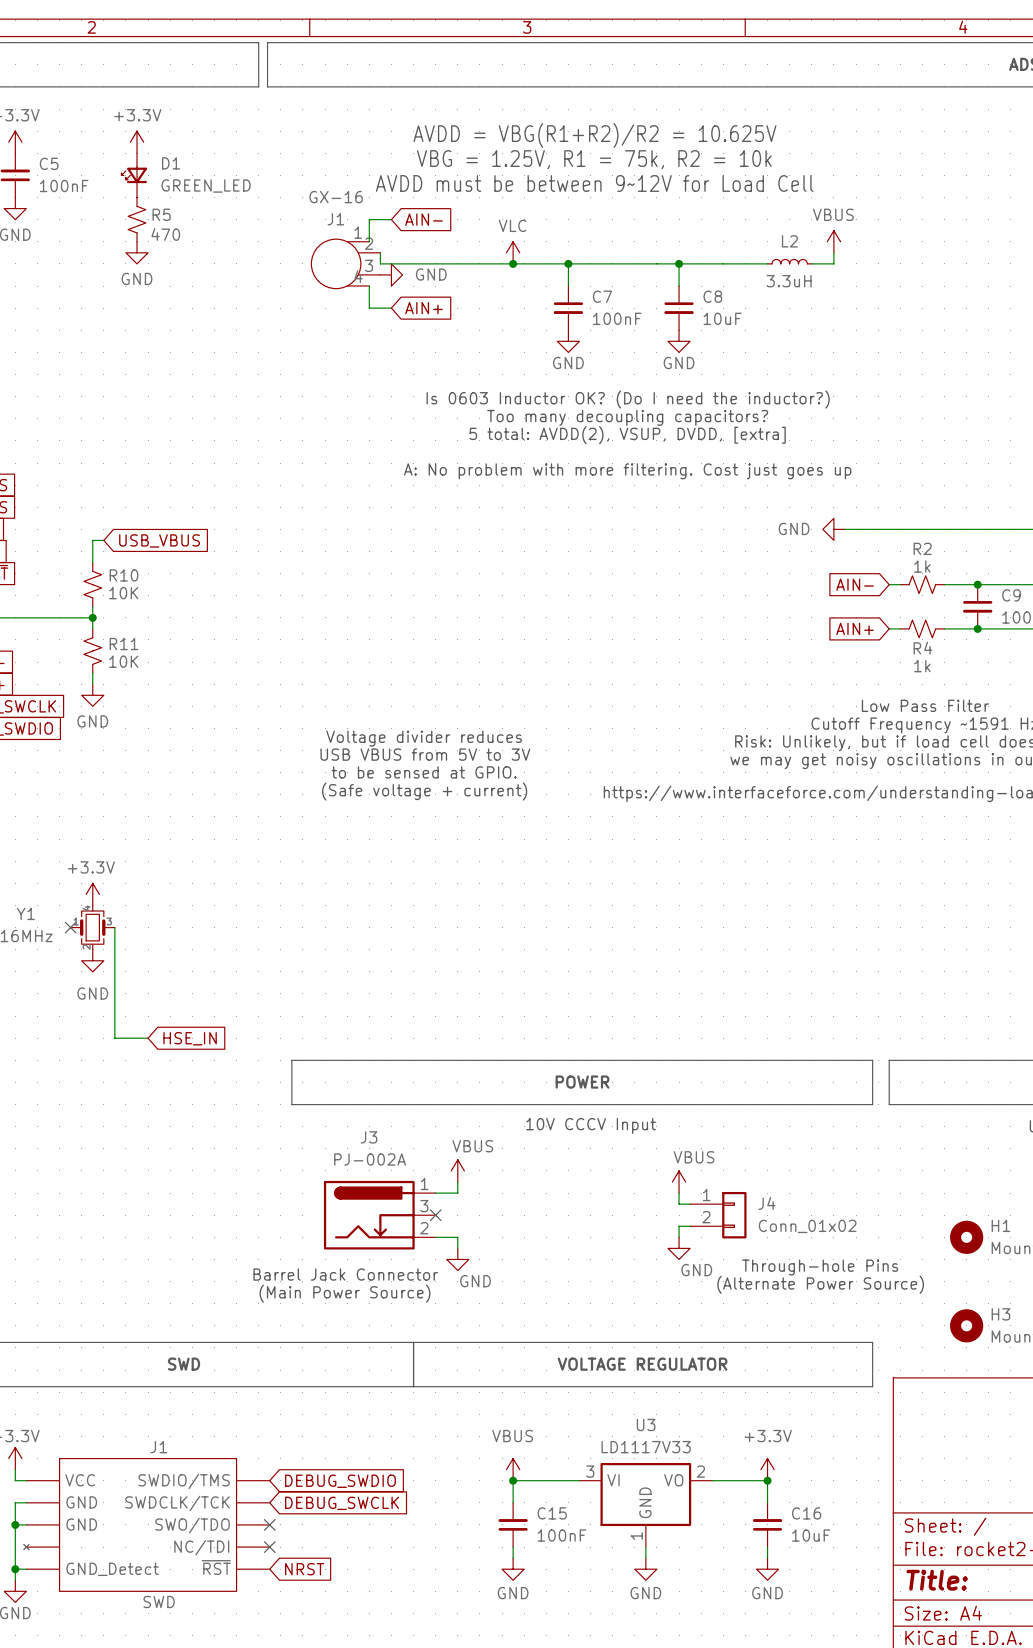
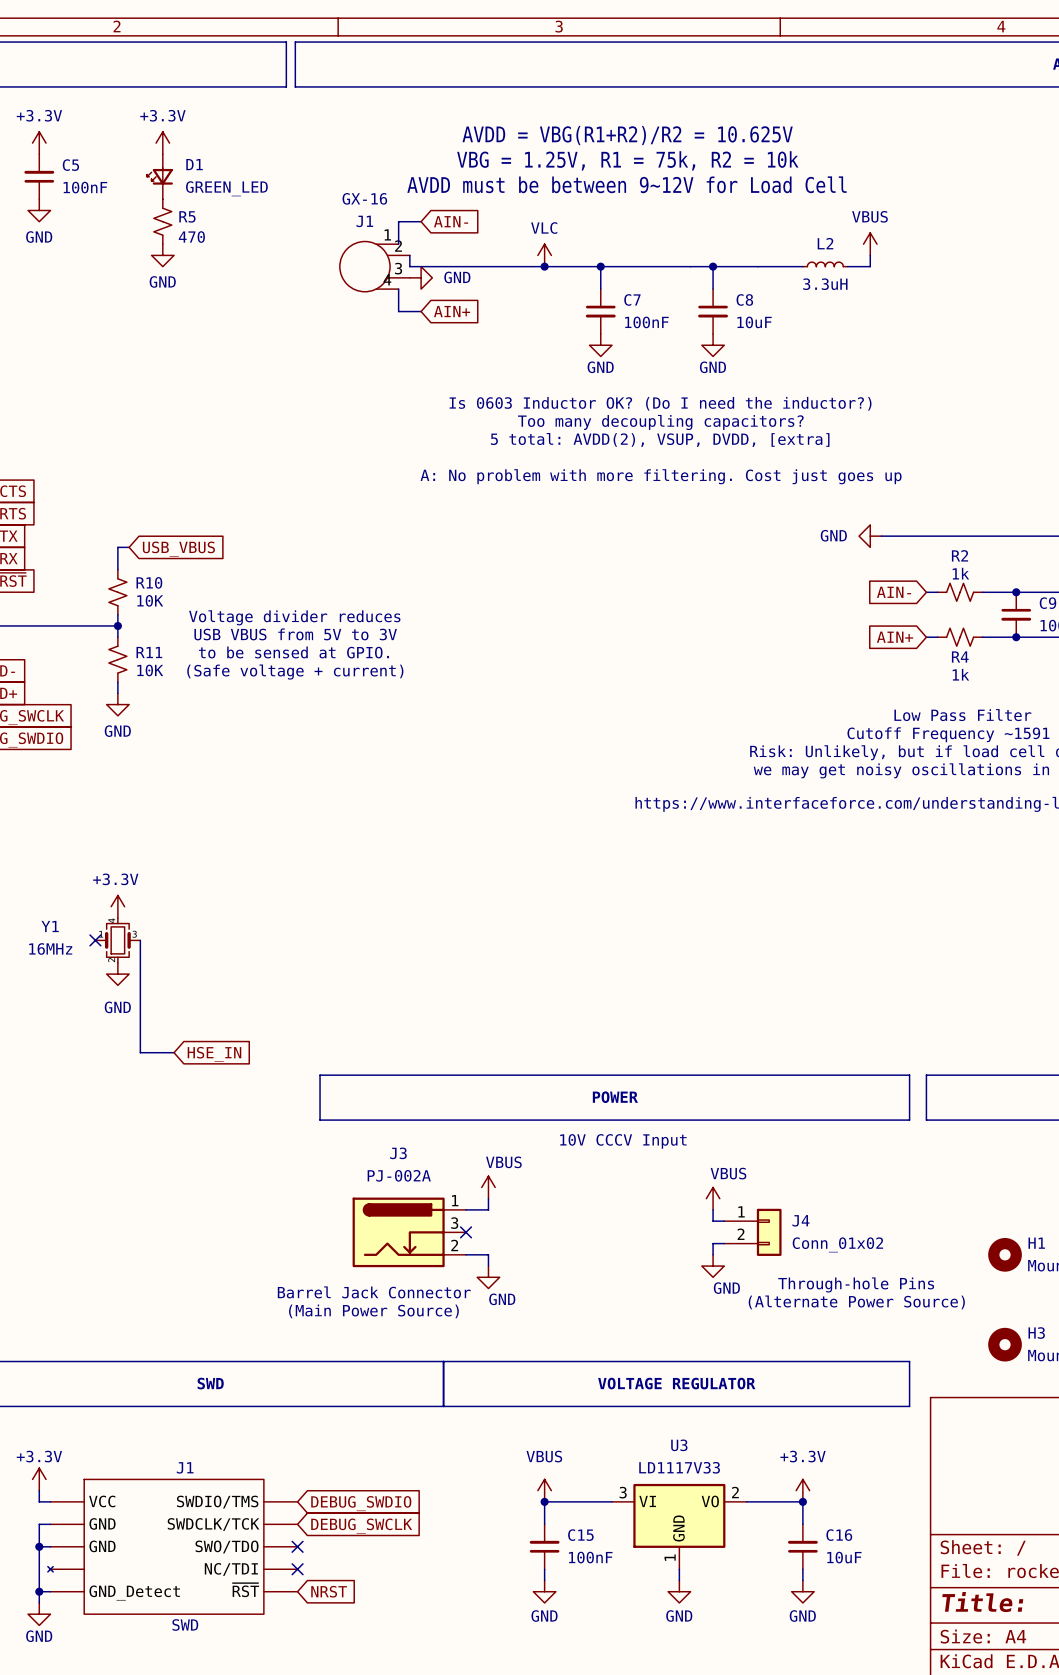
text position: Voltage divider reduces (424, 738) -> Voltage divider reduces (294, 617)
text position: USB VBUS from 5V to 3V (425, 754) -> USB VBUS from 5V to 3V (295, 634)
text position: to be sensed at GPIO. (424, 772) -> to be sensed at GPIO. (293, 652)
text position: (Safe voltage + current) (424, 791) -> (Safe voltage + current) (295, 672)

